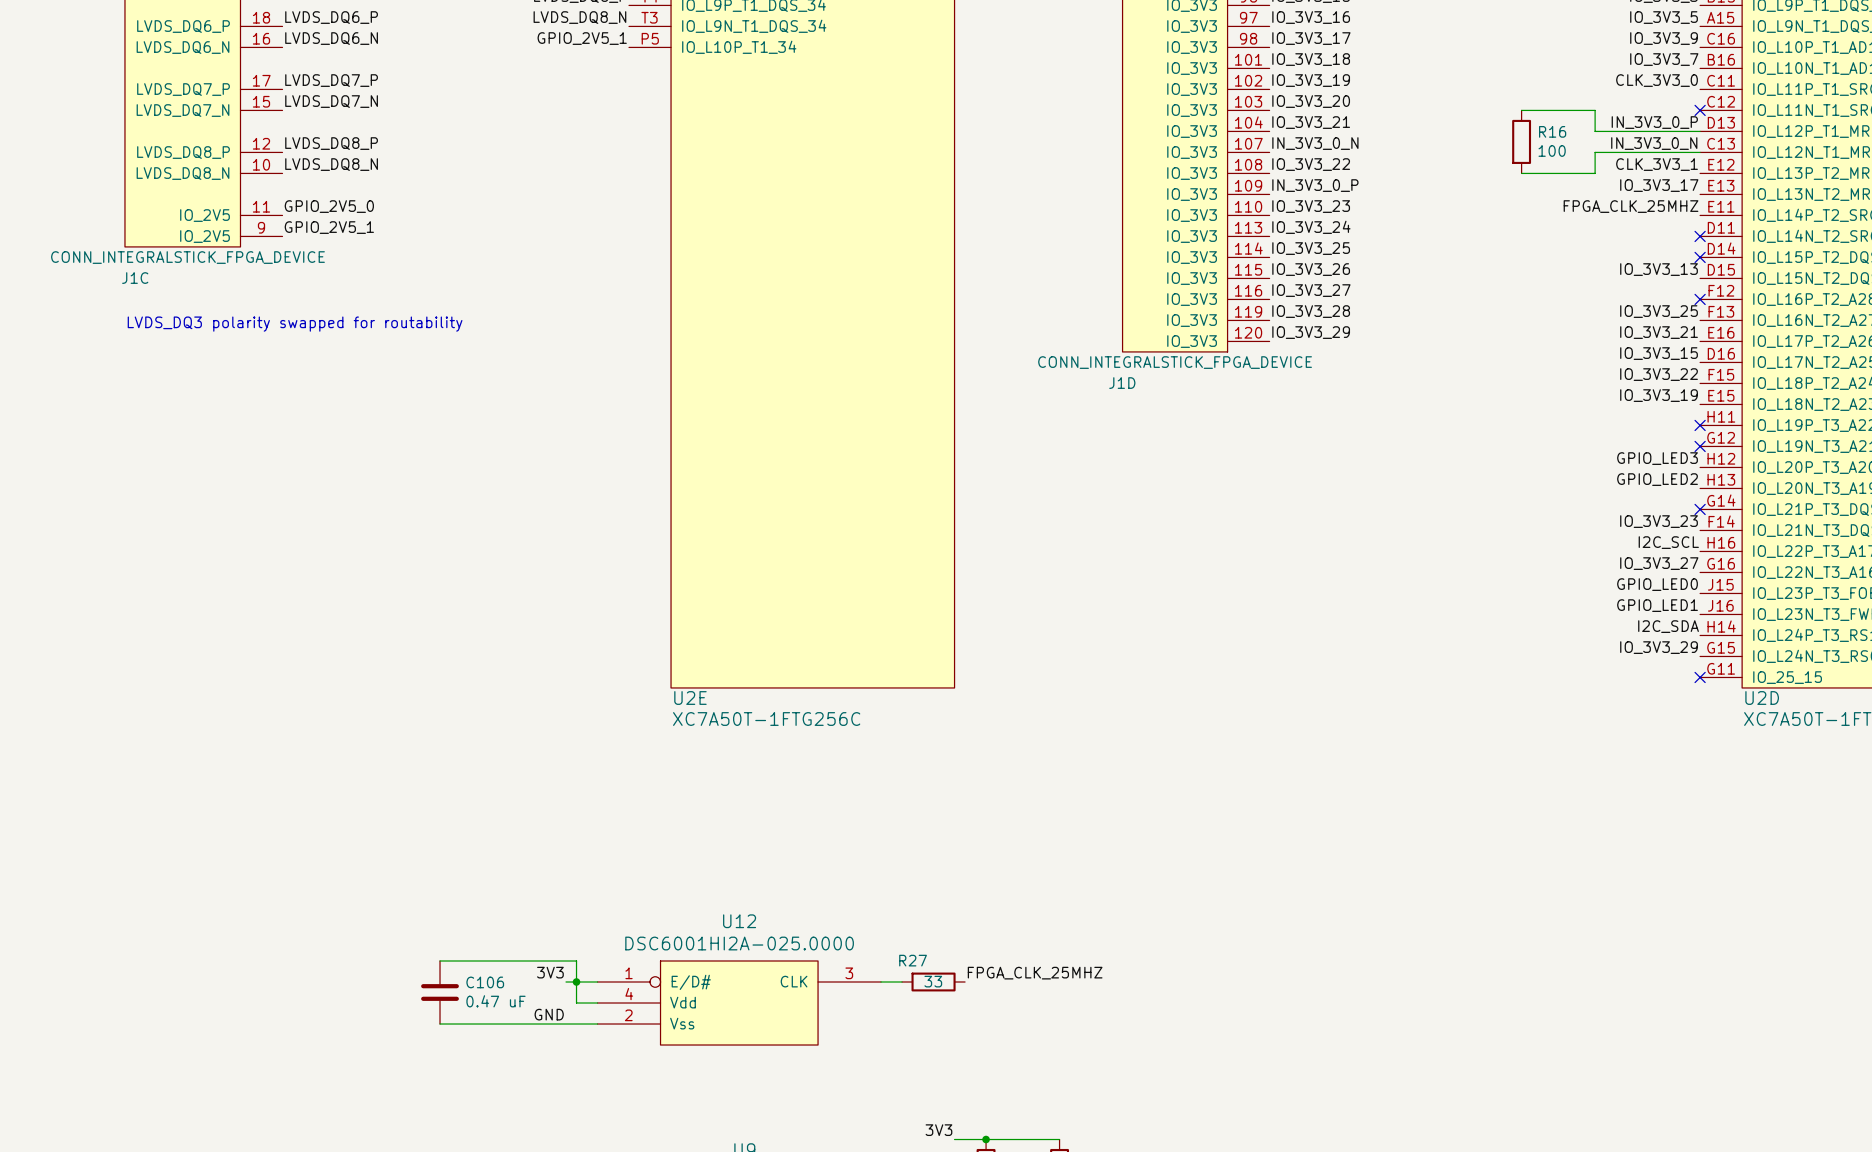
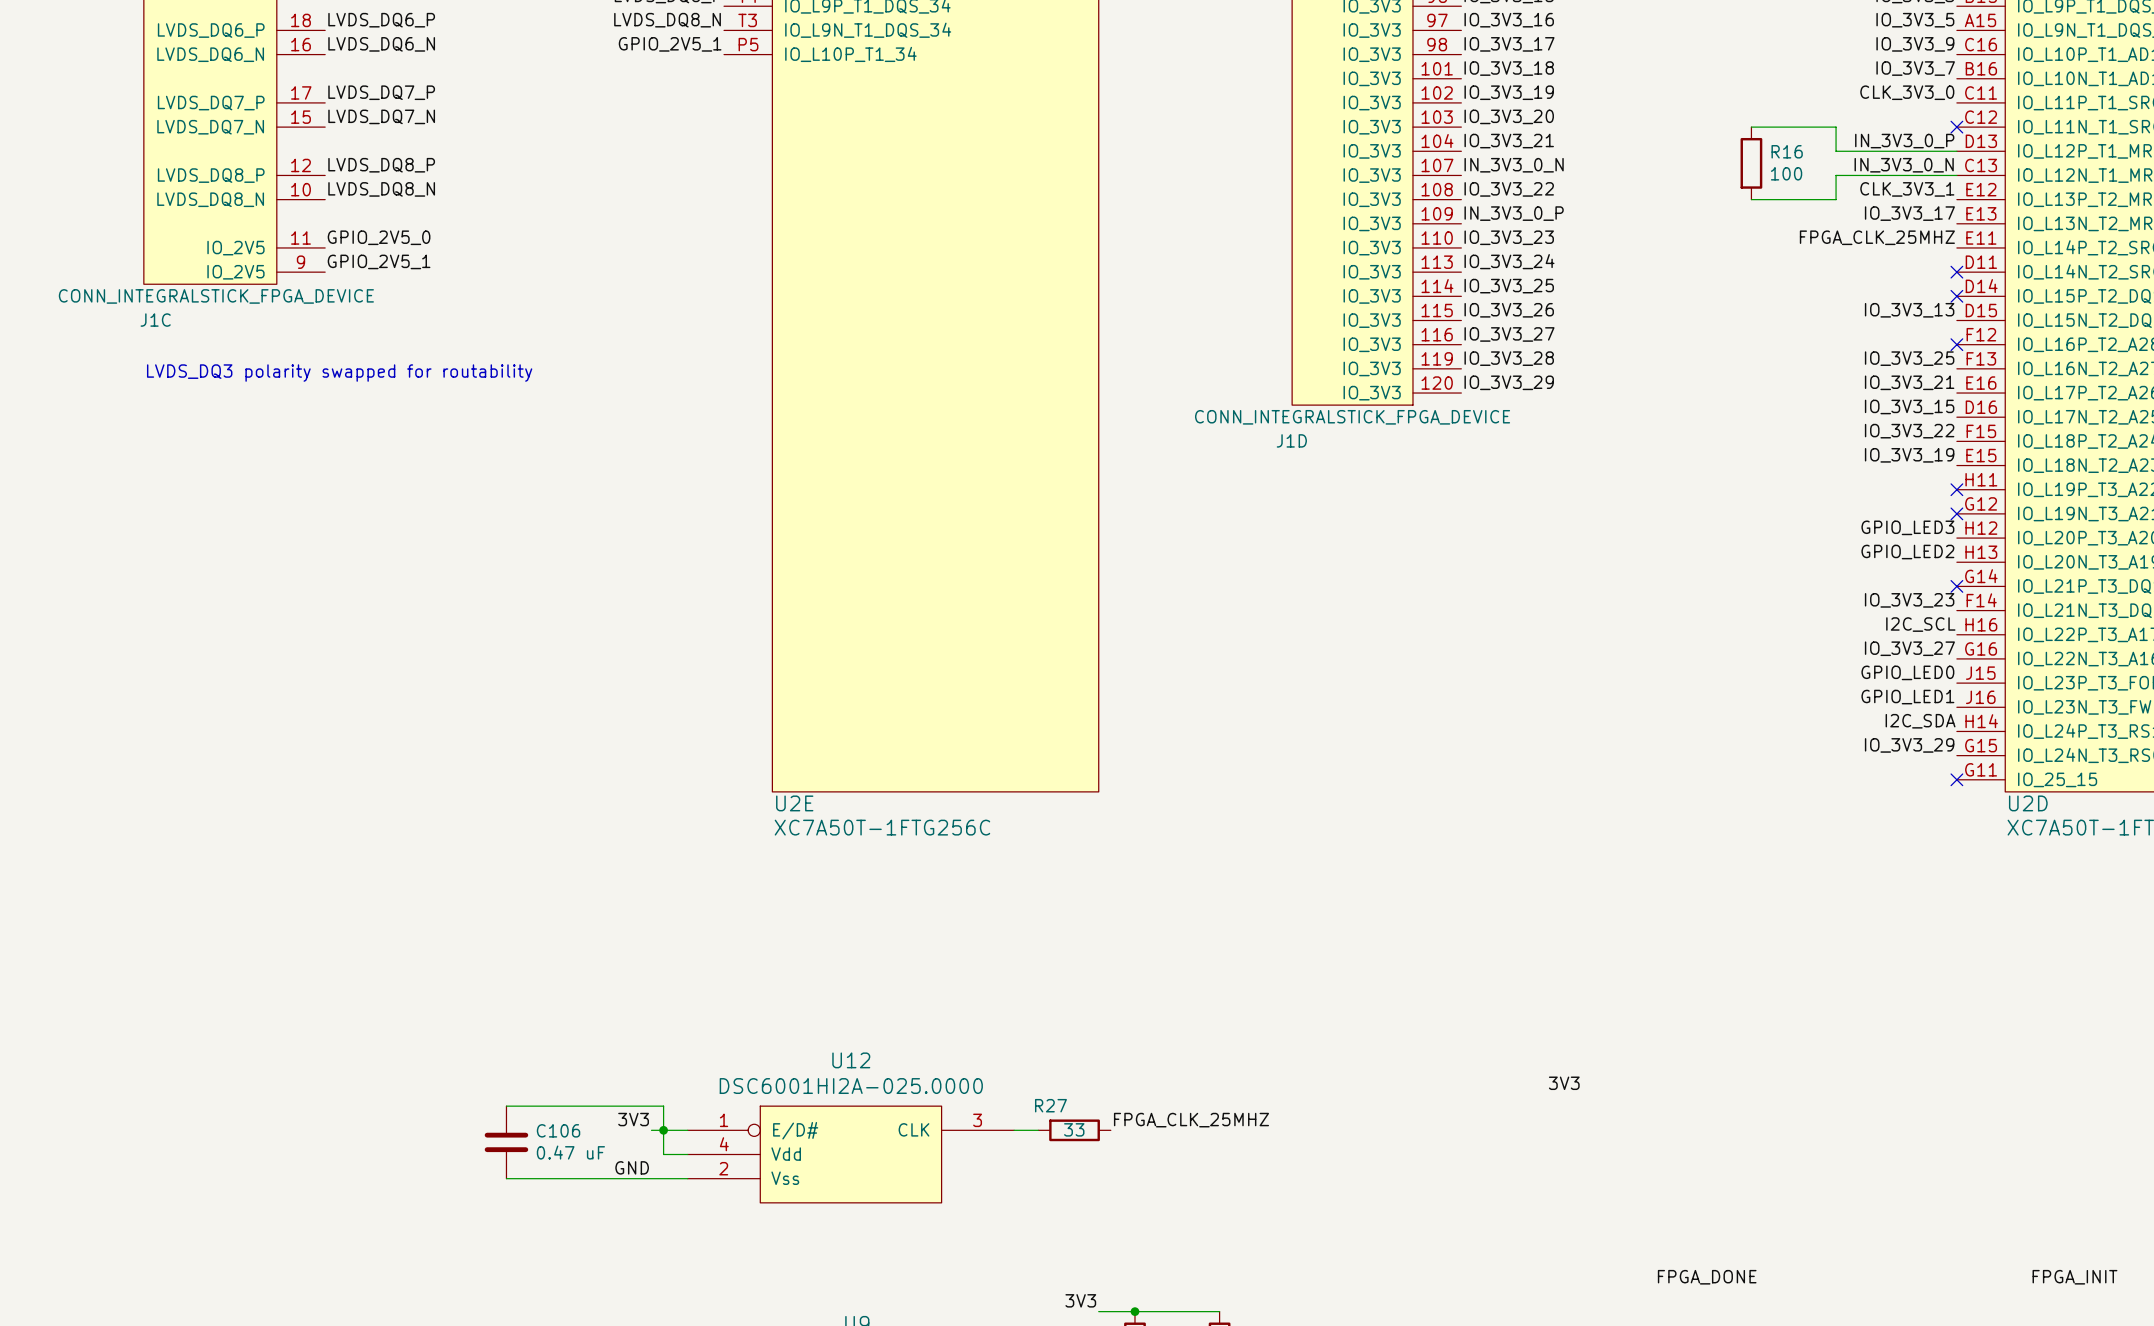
label: none -> 3V3 (1564, 1083)
label: none -> FPGA_DONE (1707, 1277)
label: none -> FPGA_INIT (2074, 1277)

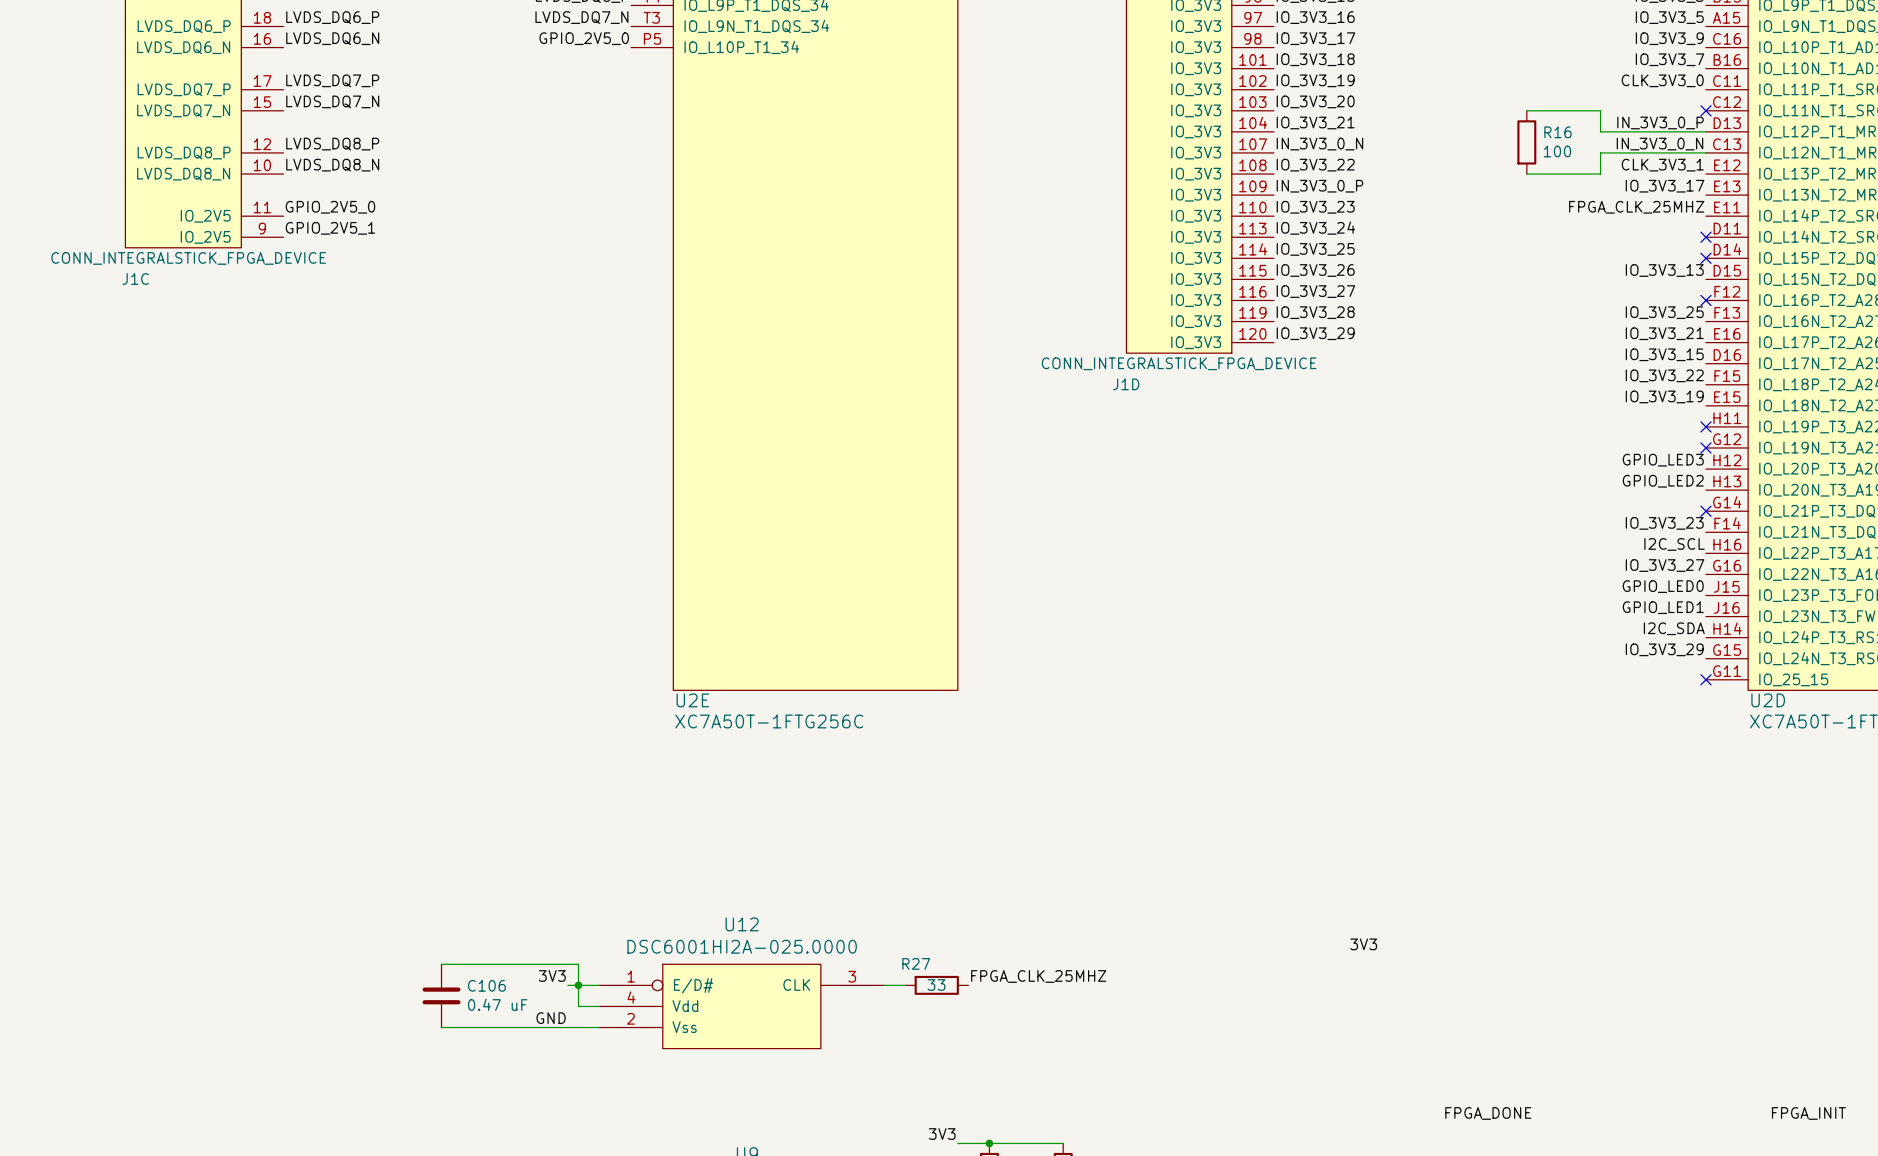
label: LVDS_DQ8_N (667, 20) -> LVDS_DQ7_N (581, 17)
label: GPIO_2V5_1 (670, 44) -> GPIO_2V5_0 (584, 38)
text: LVDS_DQ3 polarity swapped for routability (339, 373) -> none

